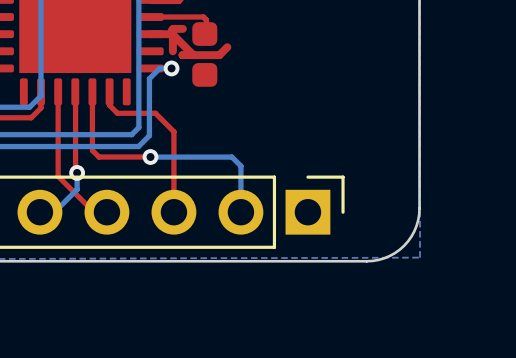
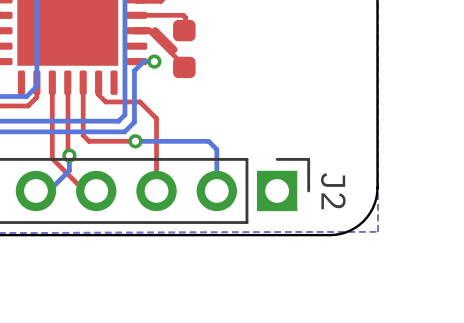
top track: (182, 28) (173, 28) (172, 34) (165, 34) -> (185, 67) (149, 30)
top track: (172, 34) (172, 51) -> none
top track: (227, 47) (219, 55) (182, 55) -> none
J2 name: none -> J2 (333, 191)

